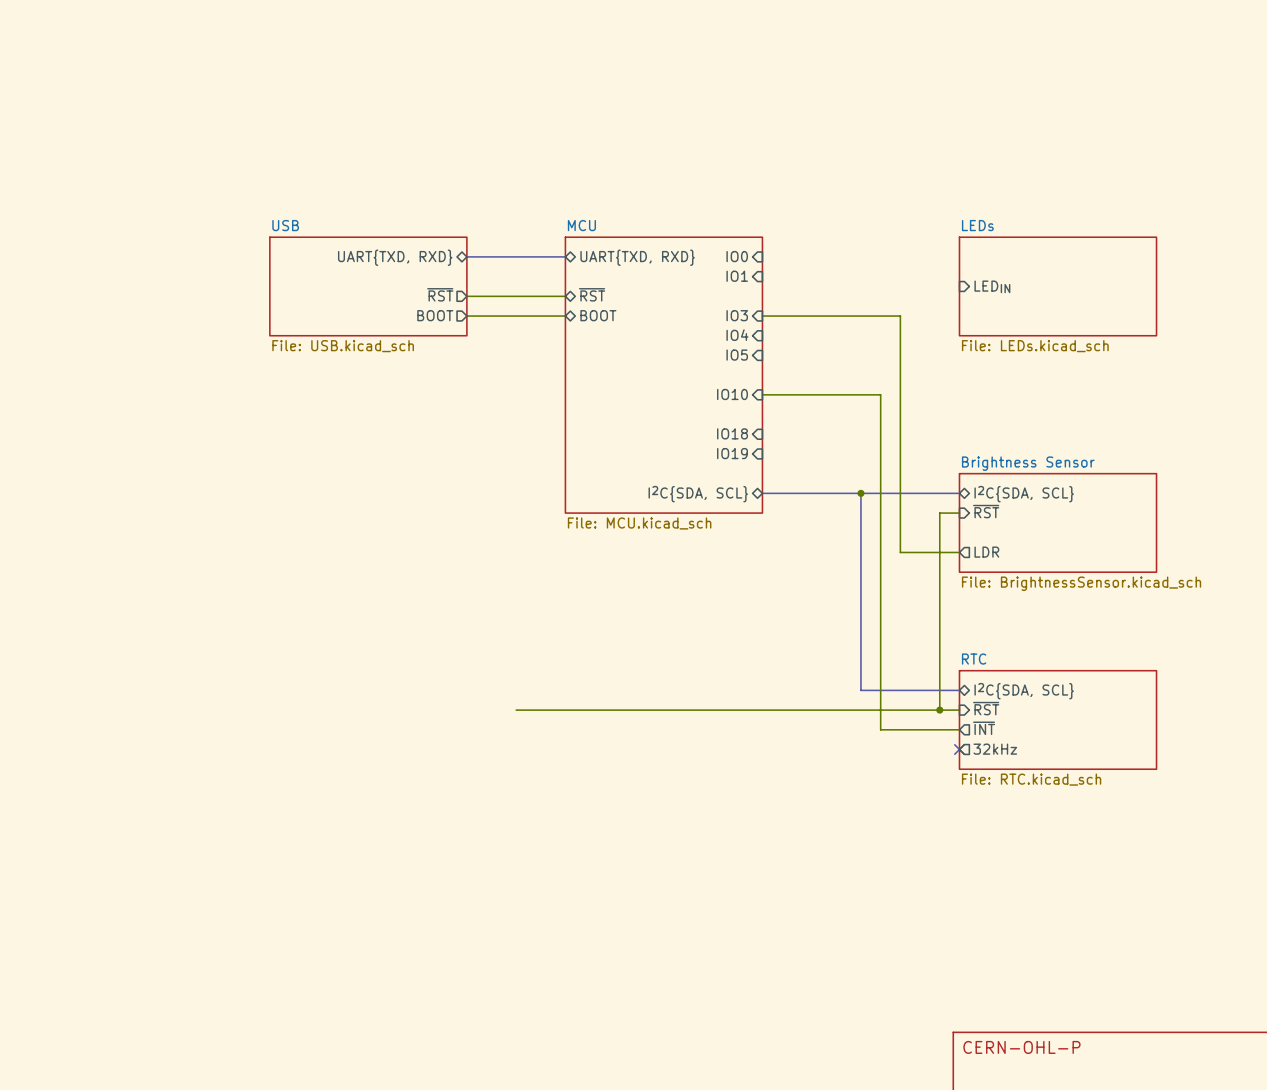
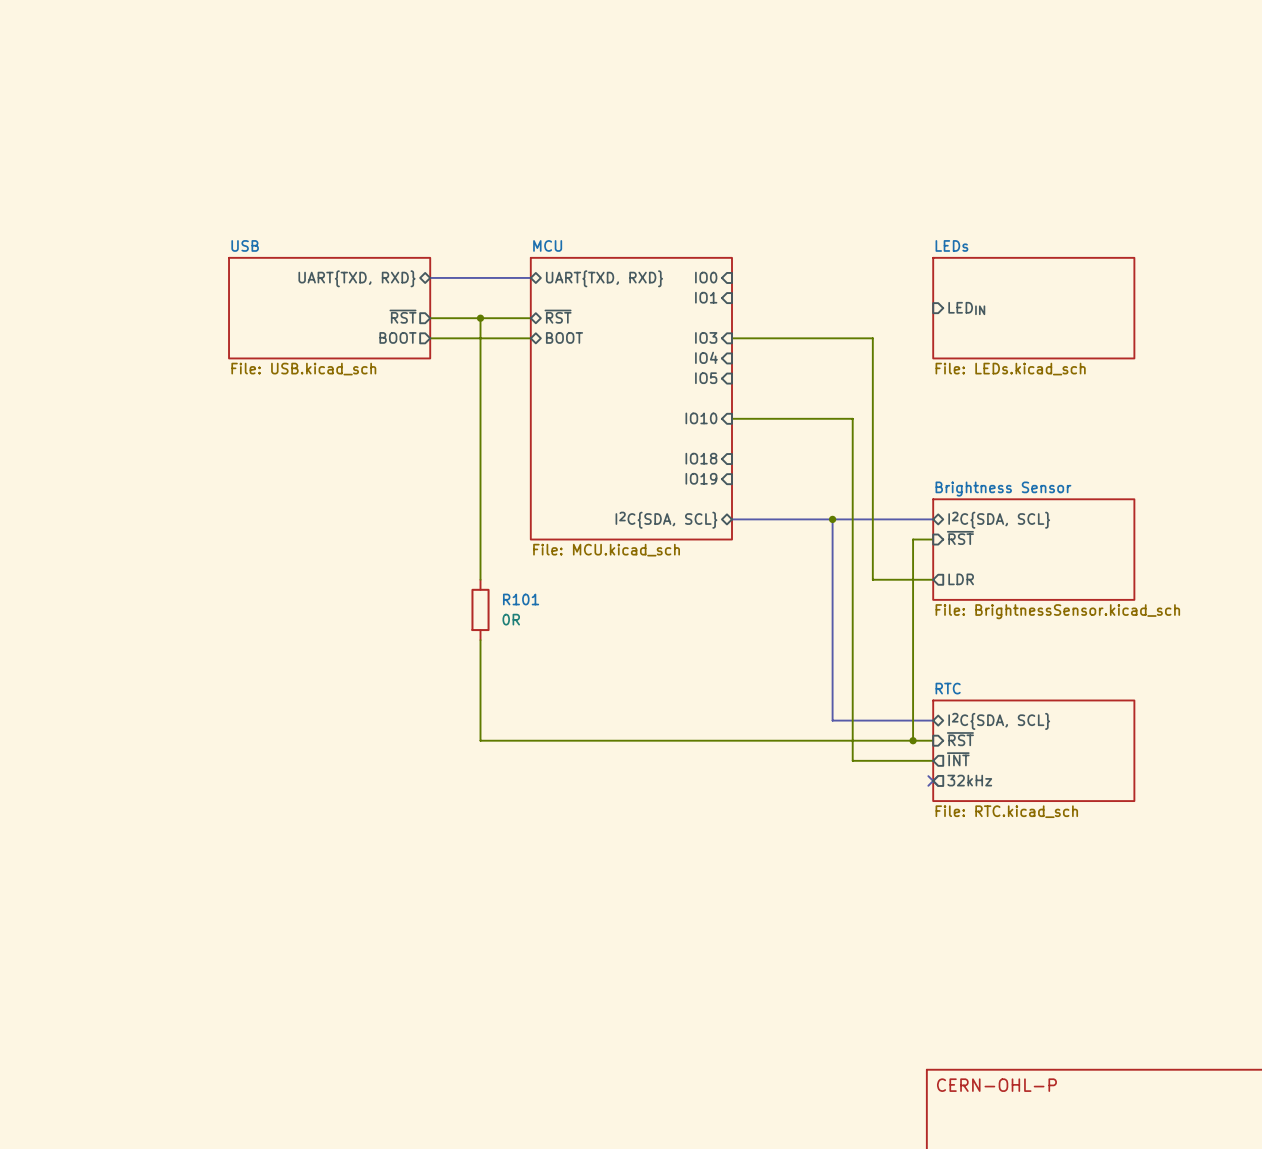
wire: none -> (480, 318) (480, 579)
junction: none -> (480, 318)
R101: none -> 0R (480, 609)
wire: none -> (480, 640) (480, 740)

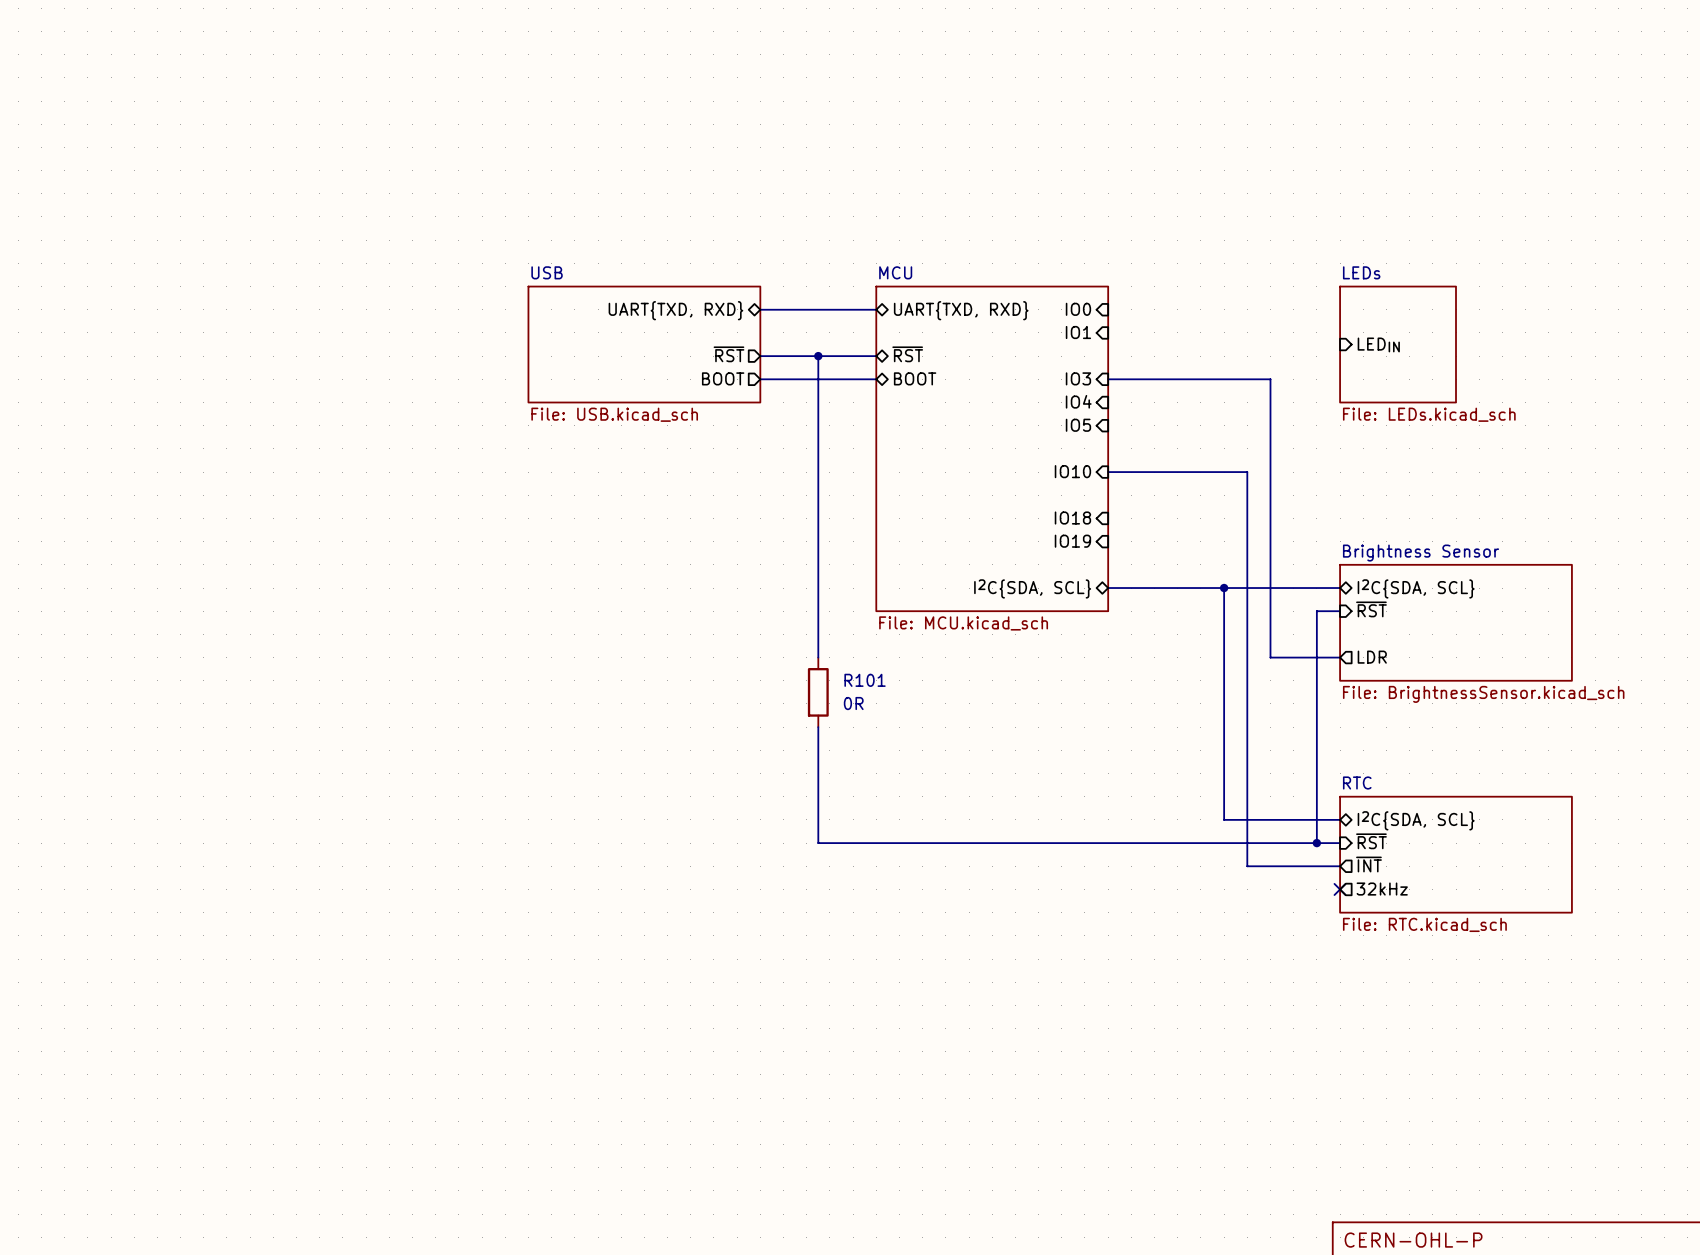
sheet LEDs: none -> File: LEDs.kicad_sch (1398, 344)
sheet LEDs: File: LEDs.kicad_sch (1033, 308) -> none

